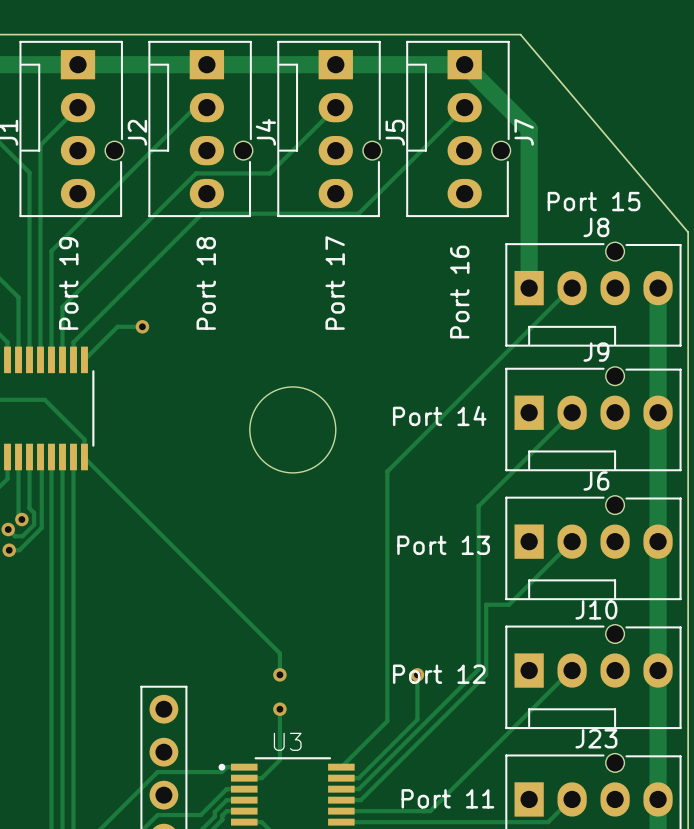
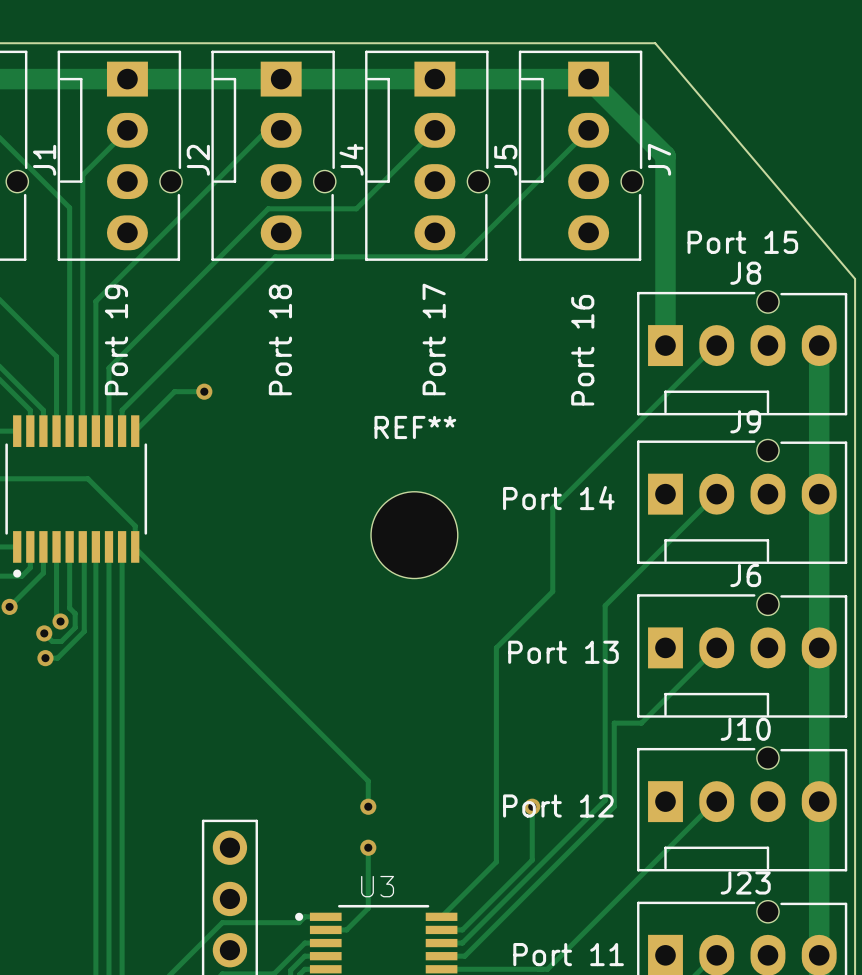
round board edge: [249, 386, 337, 474] -> none
track: (434, 424) (387, 471) (387, 541) -> (552, 508) (552, 591) (496, 647)
REF**: none -> (414, 535)

